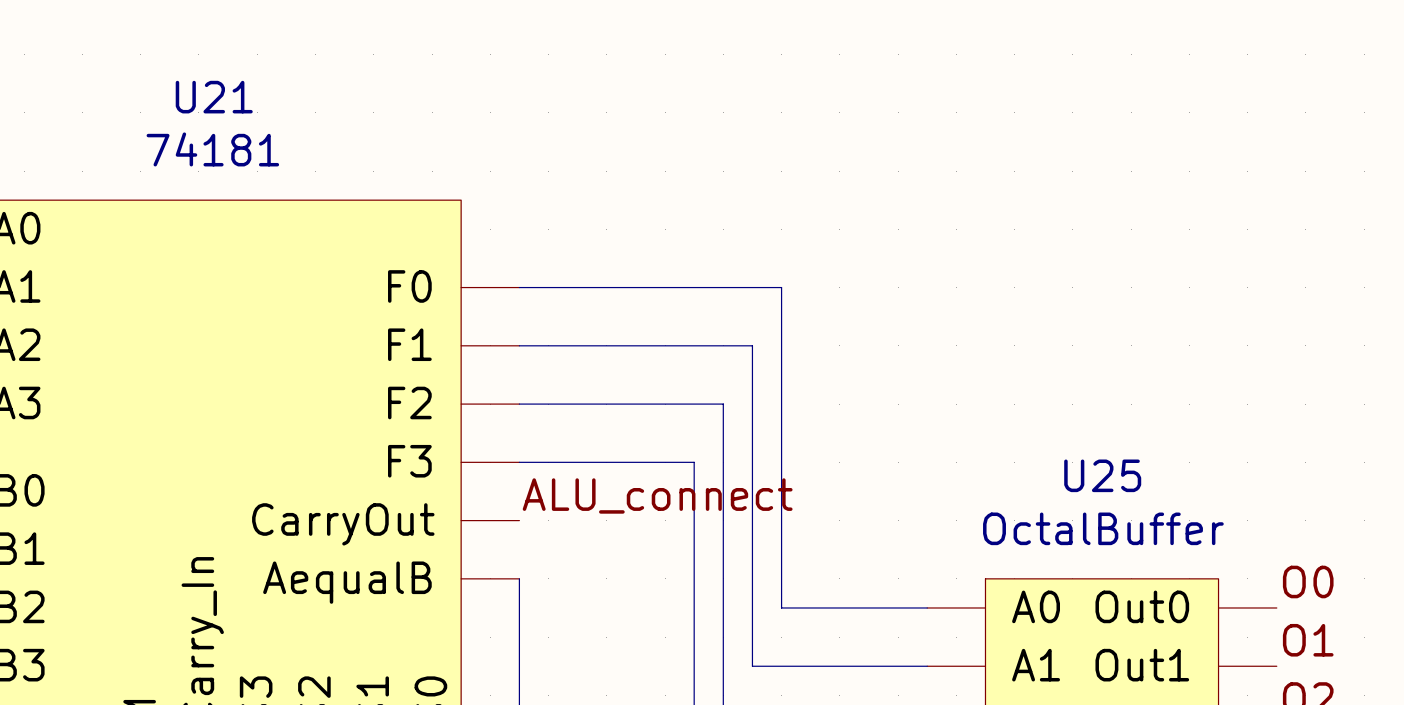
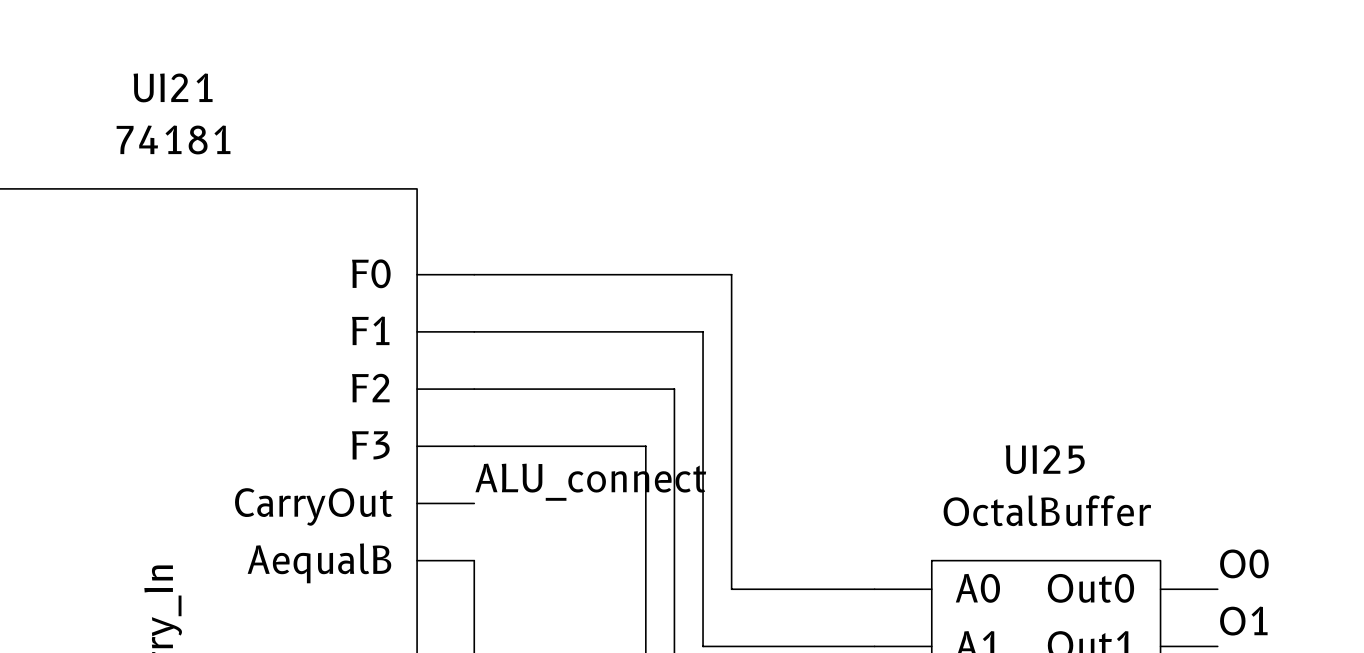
U21 name: U21 (214, 97) -> UI21 (173, 87)
U25 name: U25 (1102, 475) -> UI25 (1045, 459)

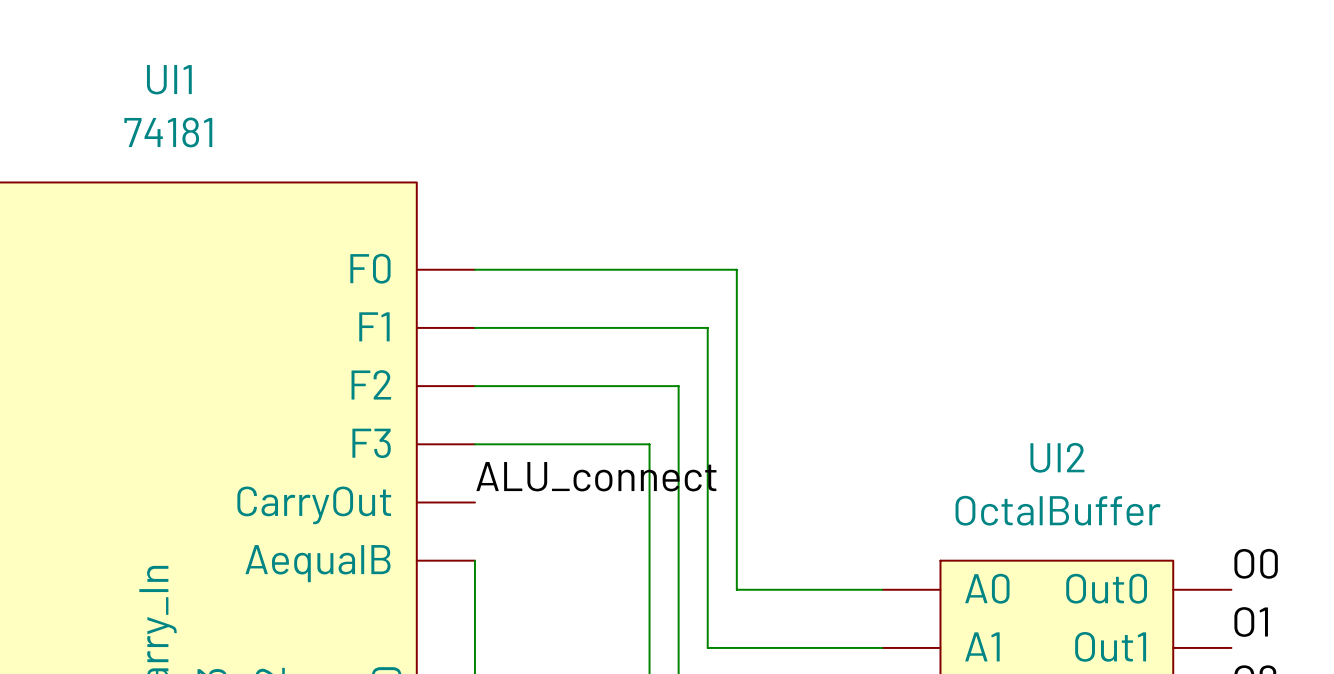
UI21 name: UI21 (173, 87) -> UI1 (169, 79)
UI25 name: UI25 (1045, 459) -> UI2 (1057, 457)

